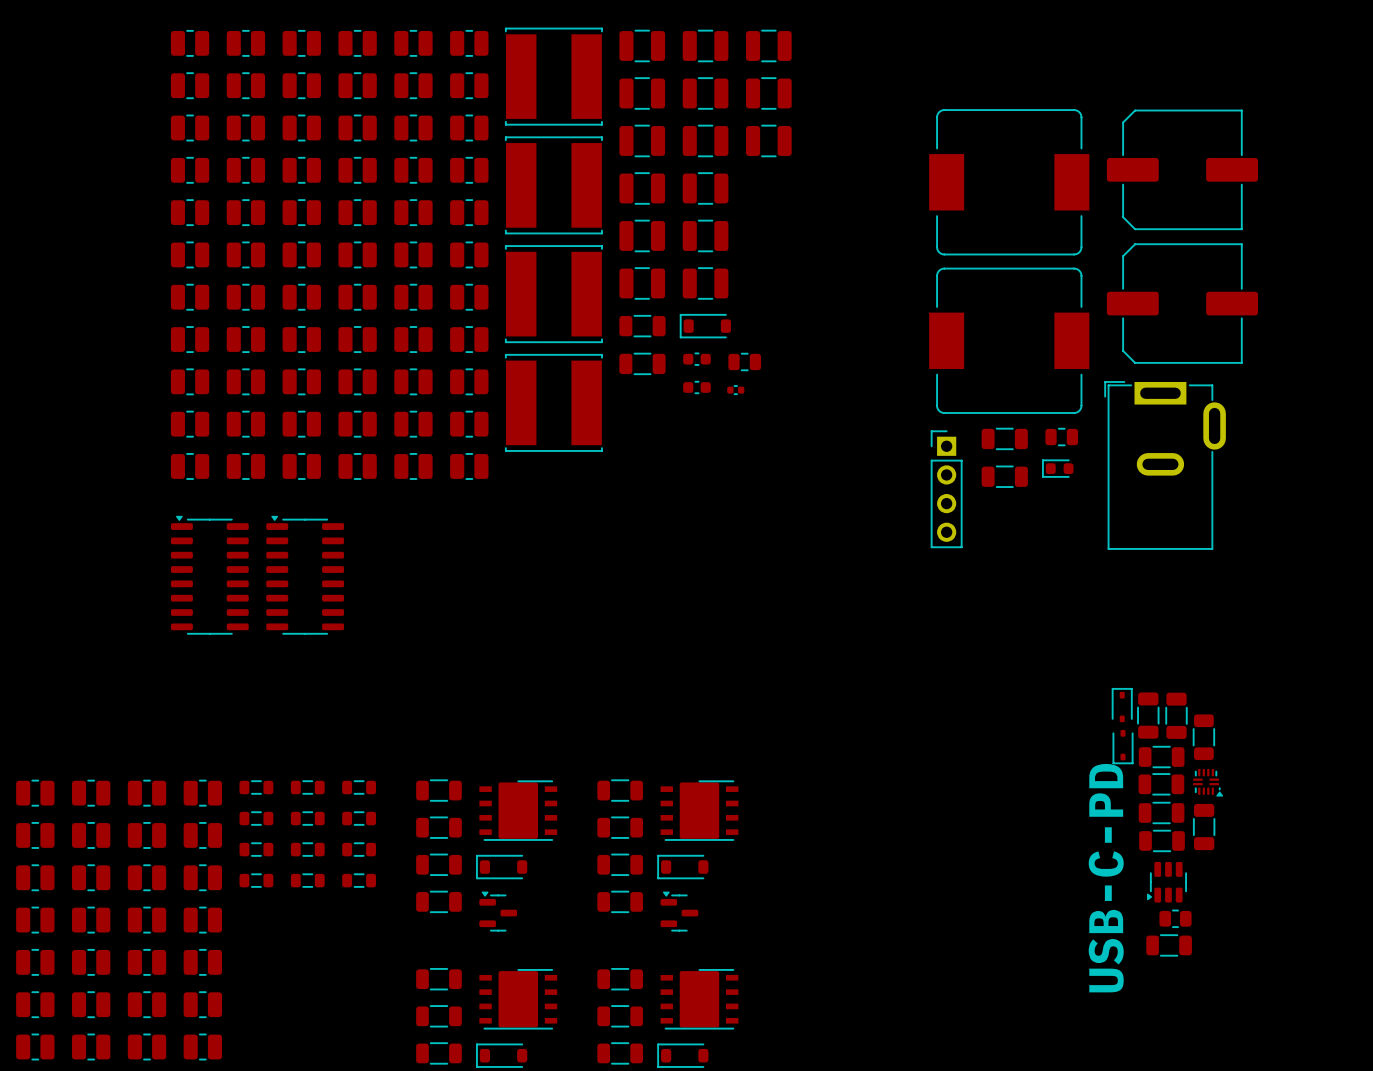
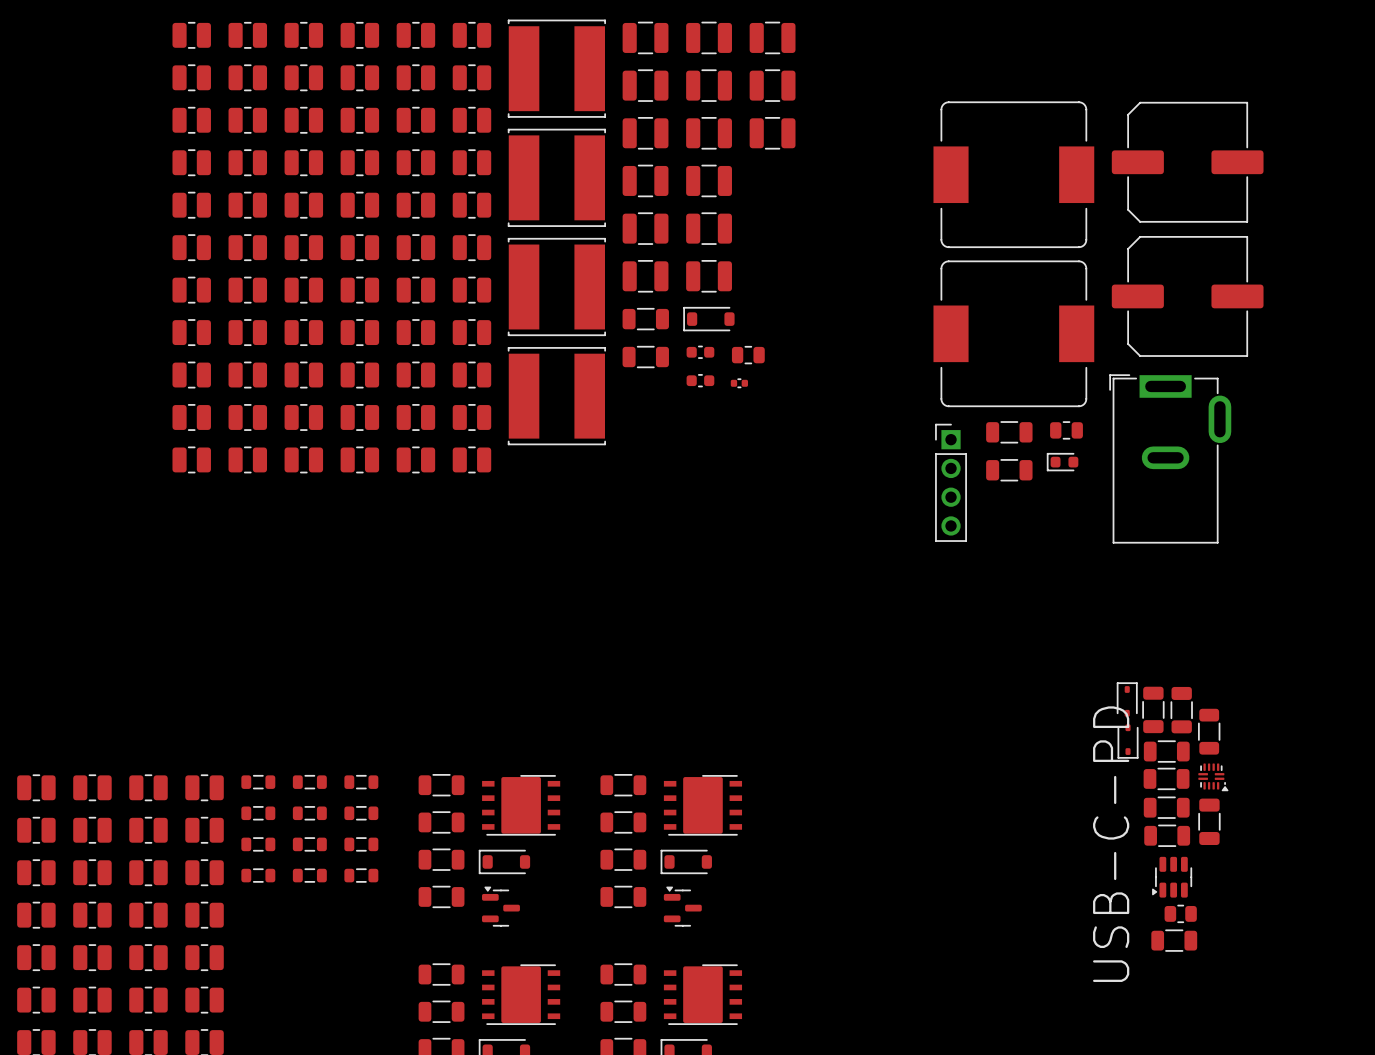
part: (209, 575) -> none
part: (305, 575) -> none

